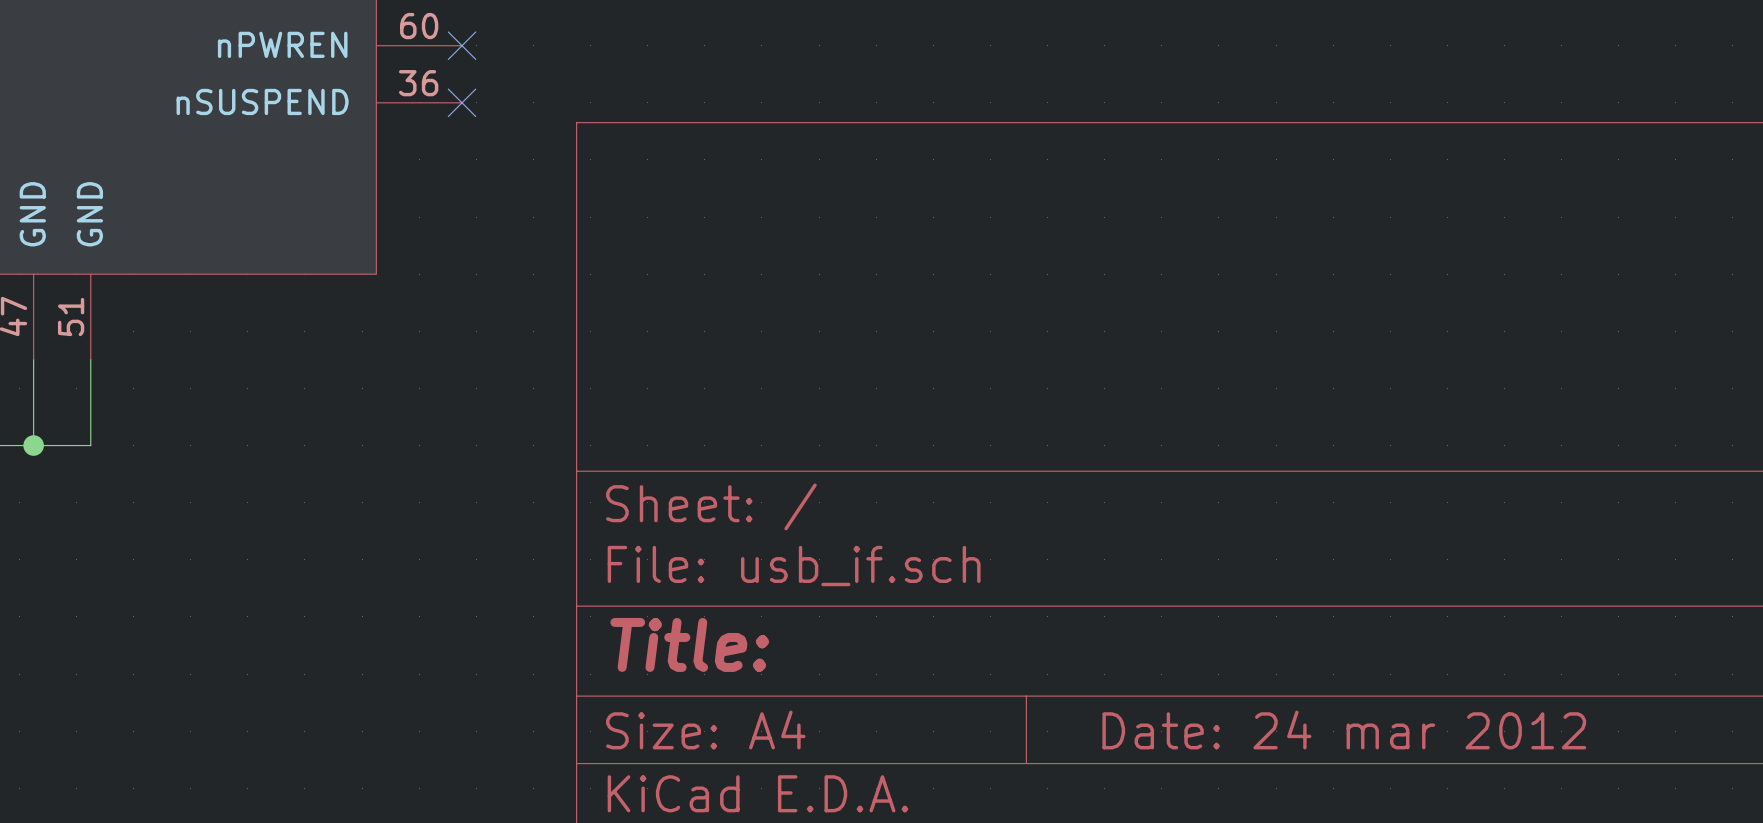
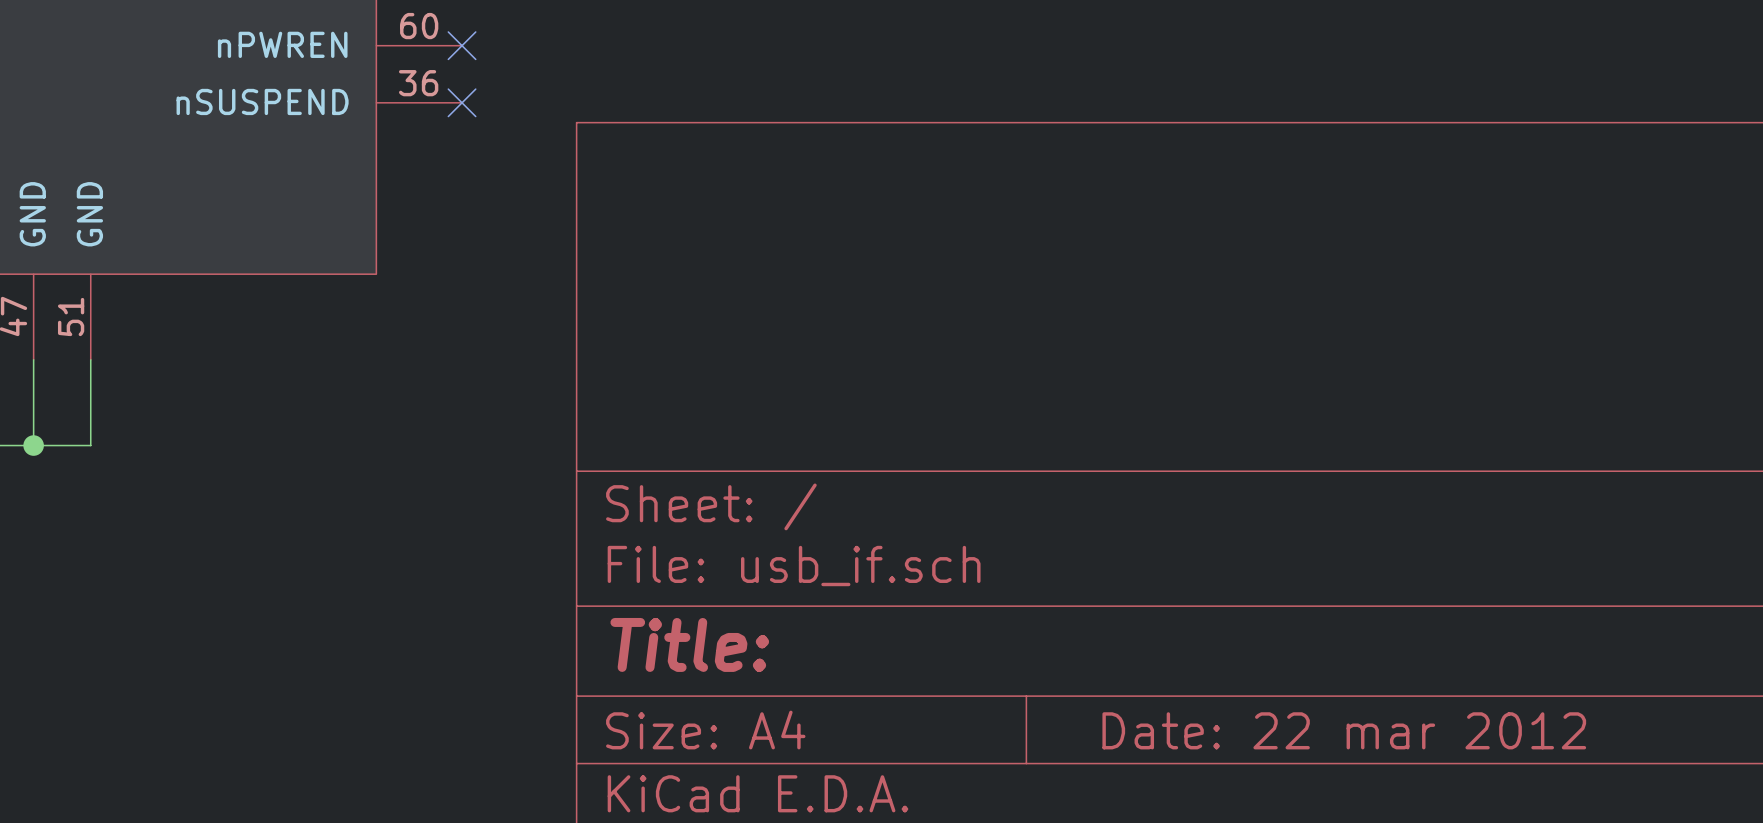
title block: Date: 24 mar 2012 (1344, 730) -> Date: 22 mar 2012 (1344, 730)

